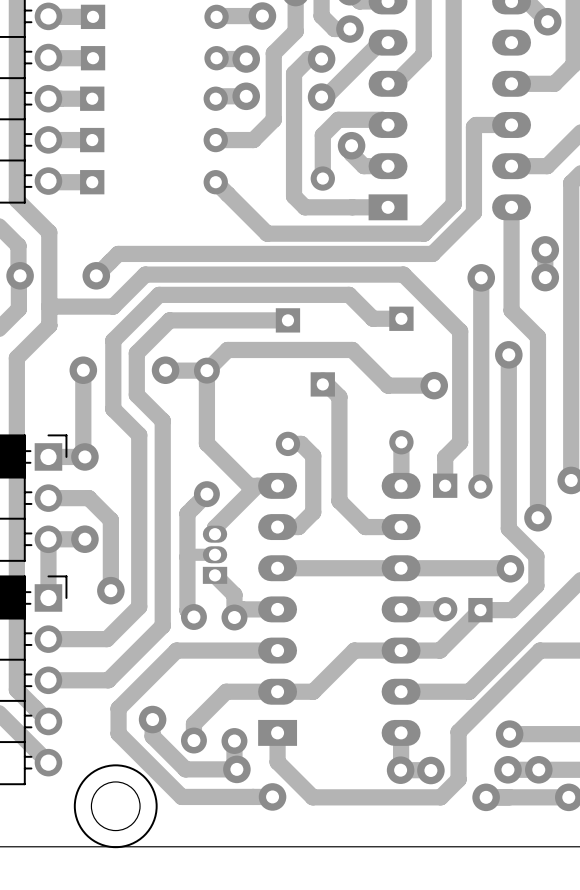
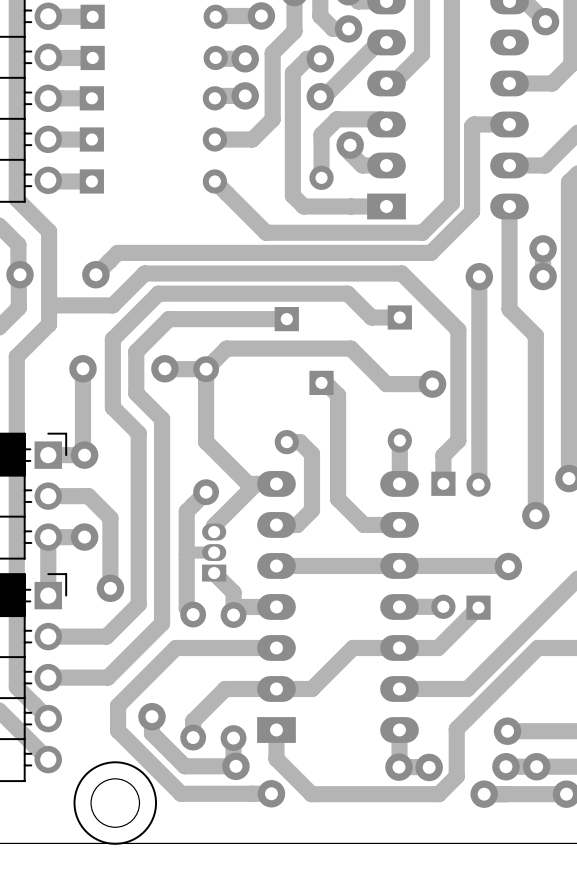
track: (508, 354) (508, 528) (536, 556) (536, 585) (512, 610) (480, 610) -> none
via: (508, 354) -> none

